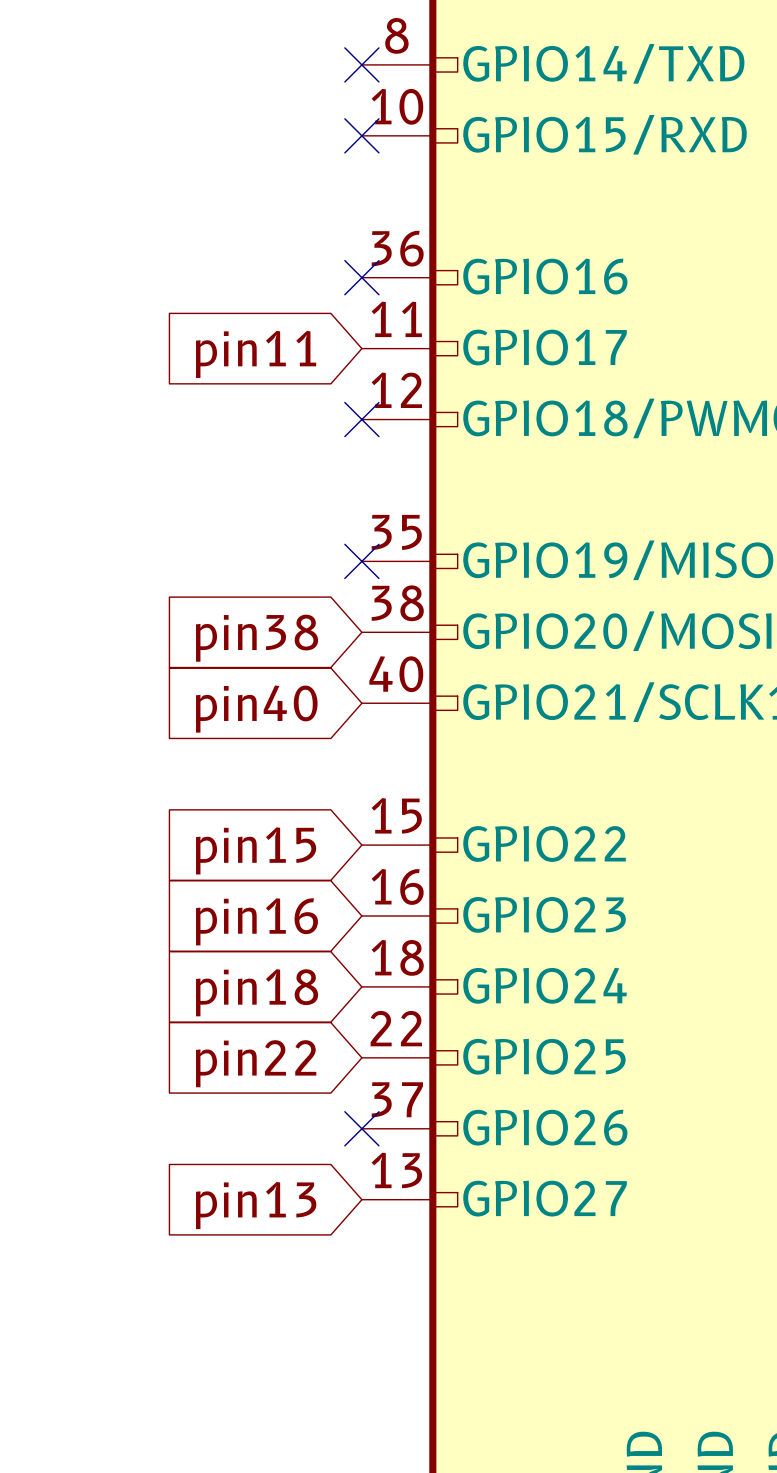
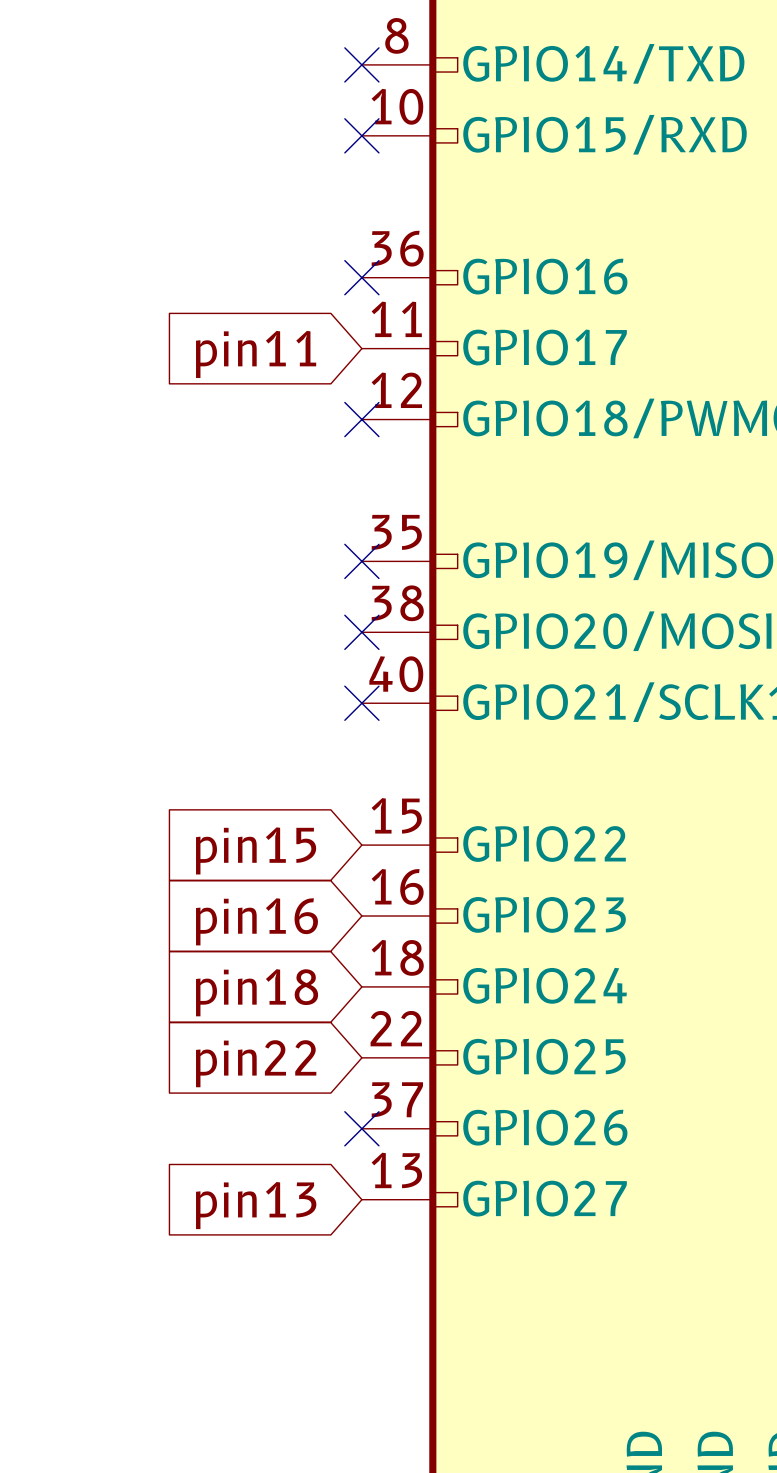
no-connect mark: none -> (361, 632)
global label: pin38 (257, 638) -> none
no-connect mark: none -> (361, 703)
global label: pin40 (256, 709) -> none

